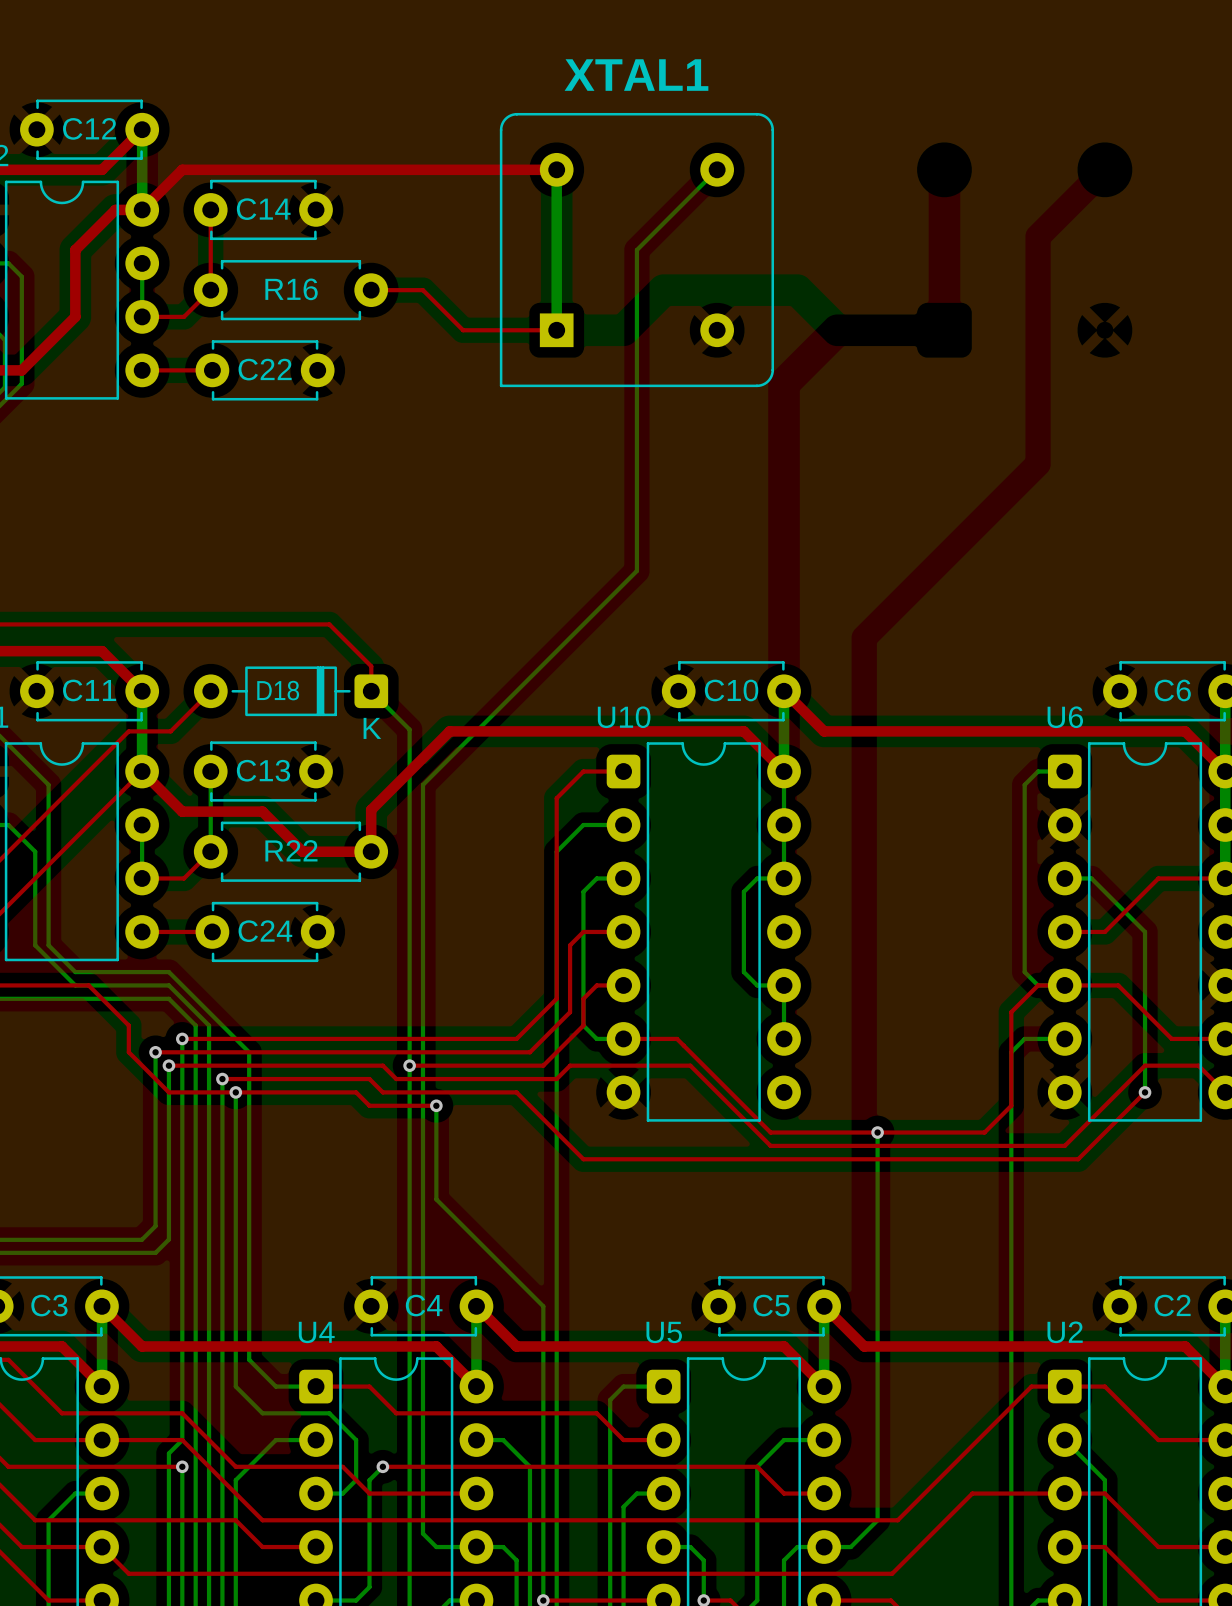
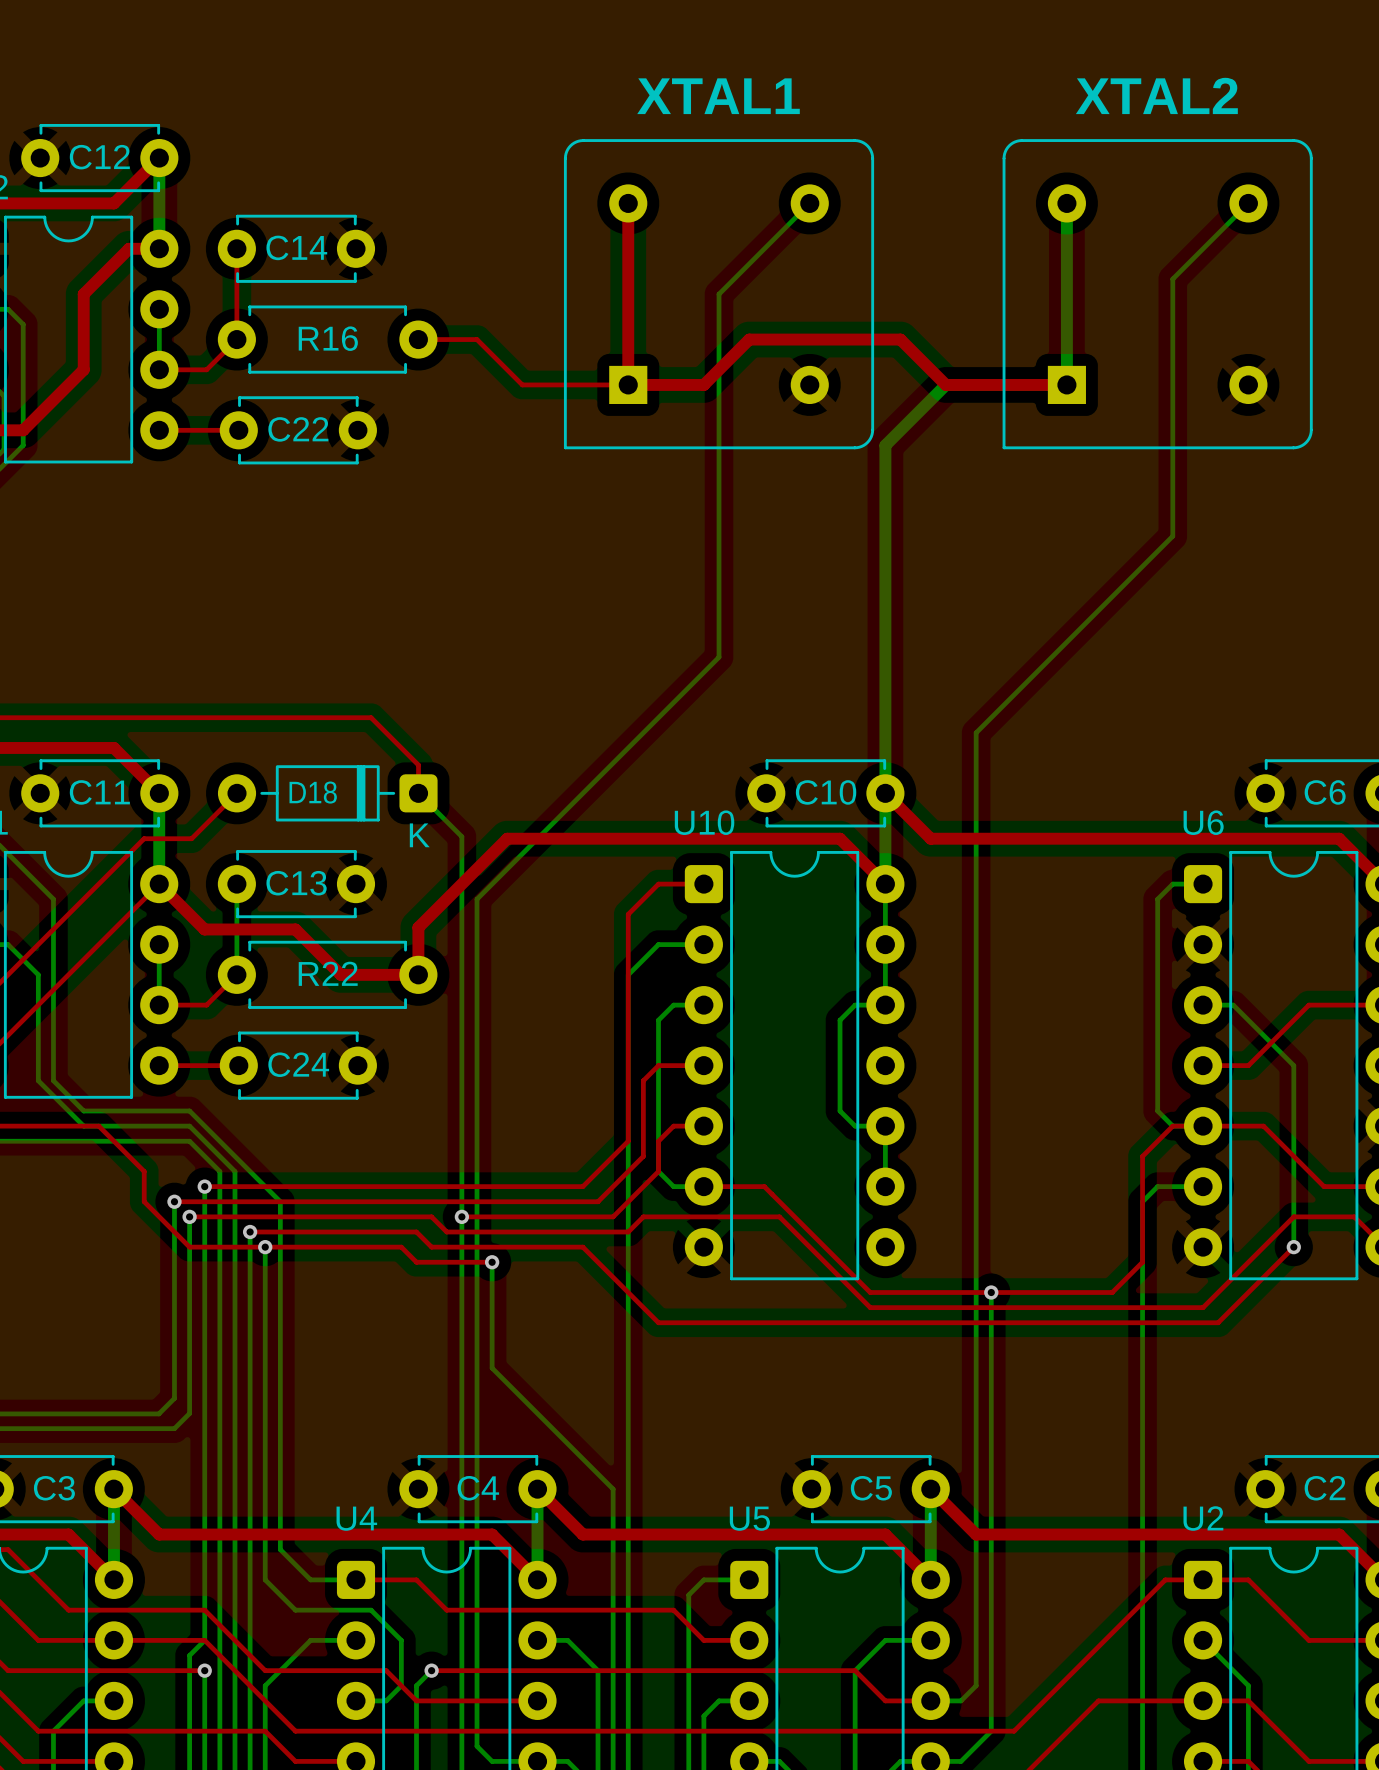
top track: (556, 169) (182, 169) (142, 209) -> (628, 203) (628, 384) (703, 384) (749, 339) (900, 339) (945, 384) (1066, 384)
bottom track: (556, 169) (556, 330) -> none
bottom track: none -> (1066, 203) (1066, 384) (945, 384) (885, 445) (885, 793)
bottom track: none -> (1248, 203) (1172, 279) (1172, 536) (976, 732) (976, 1685) (961, 1700) (930, 1700)
part: none -> XTAL2 (1157, 294)

